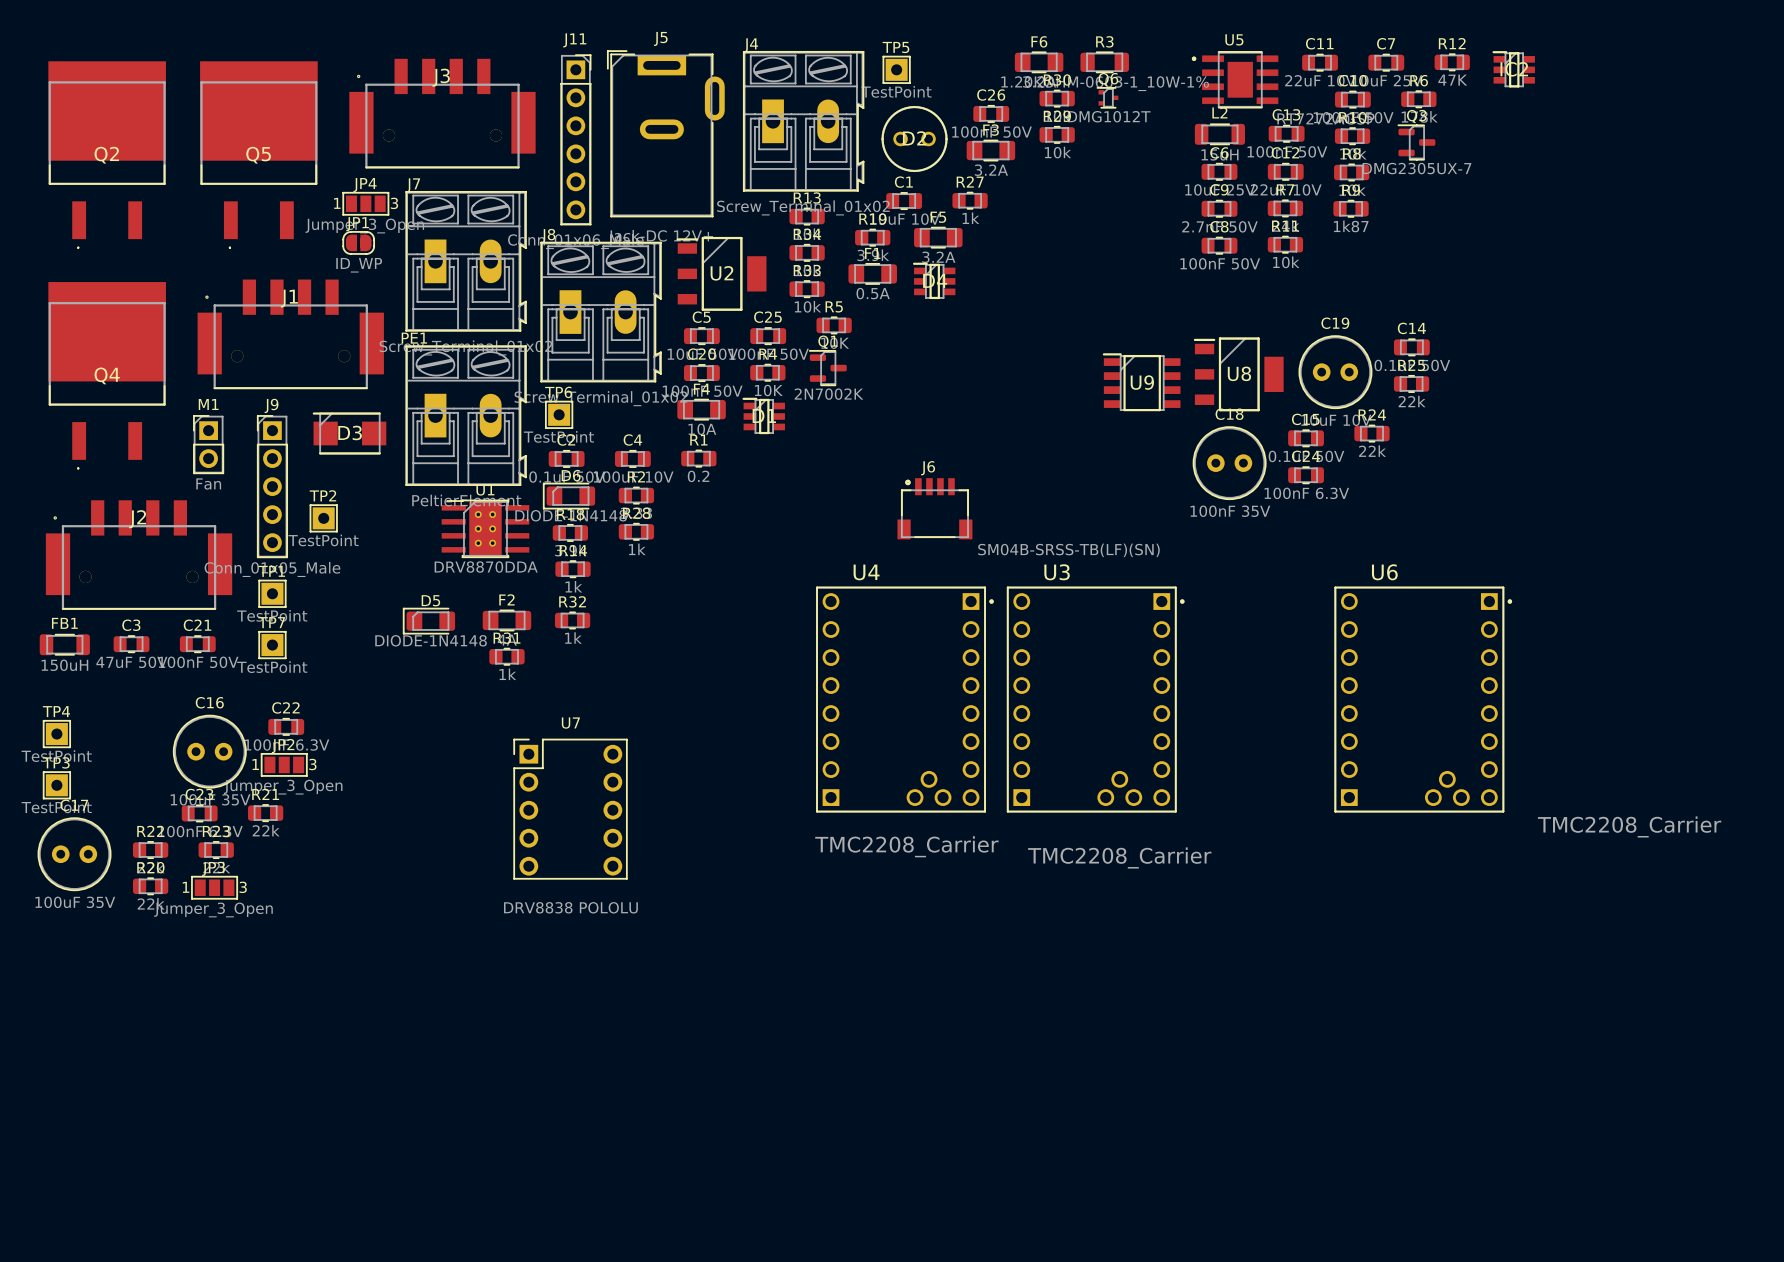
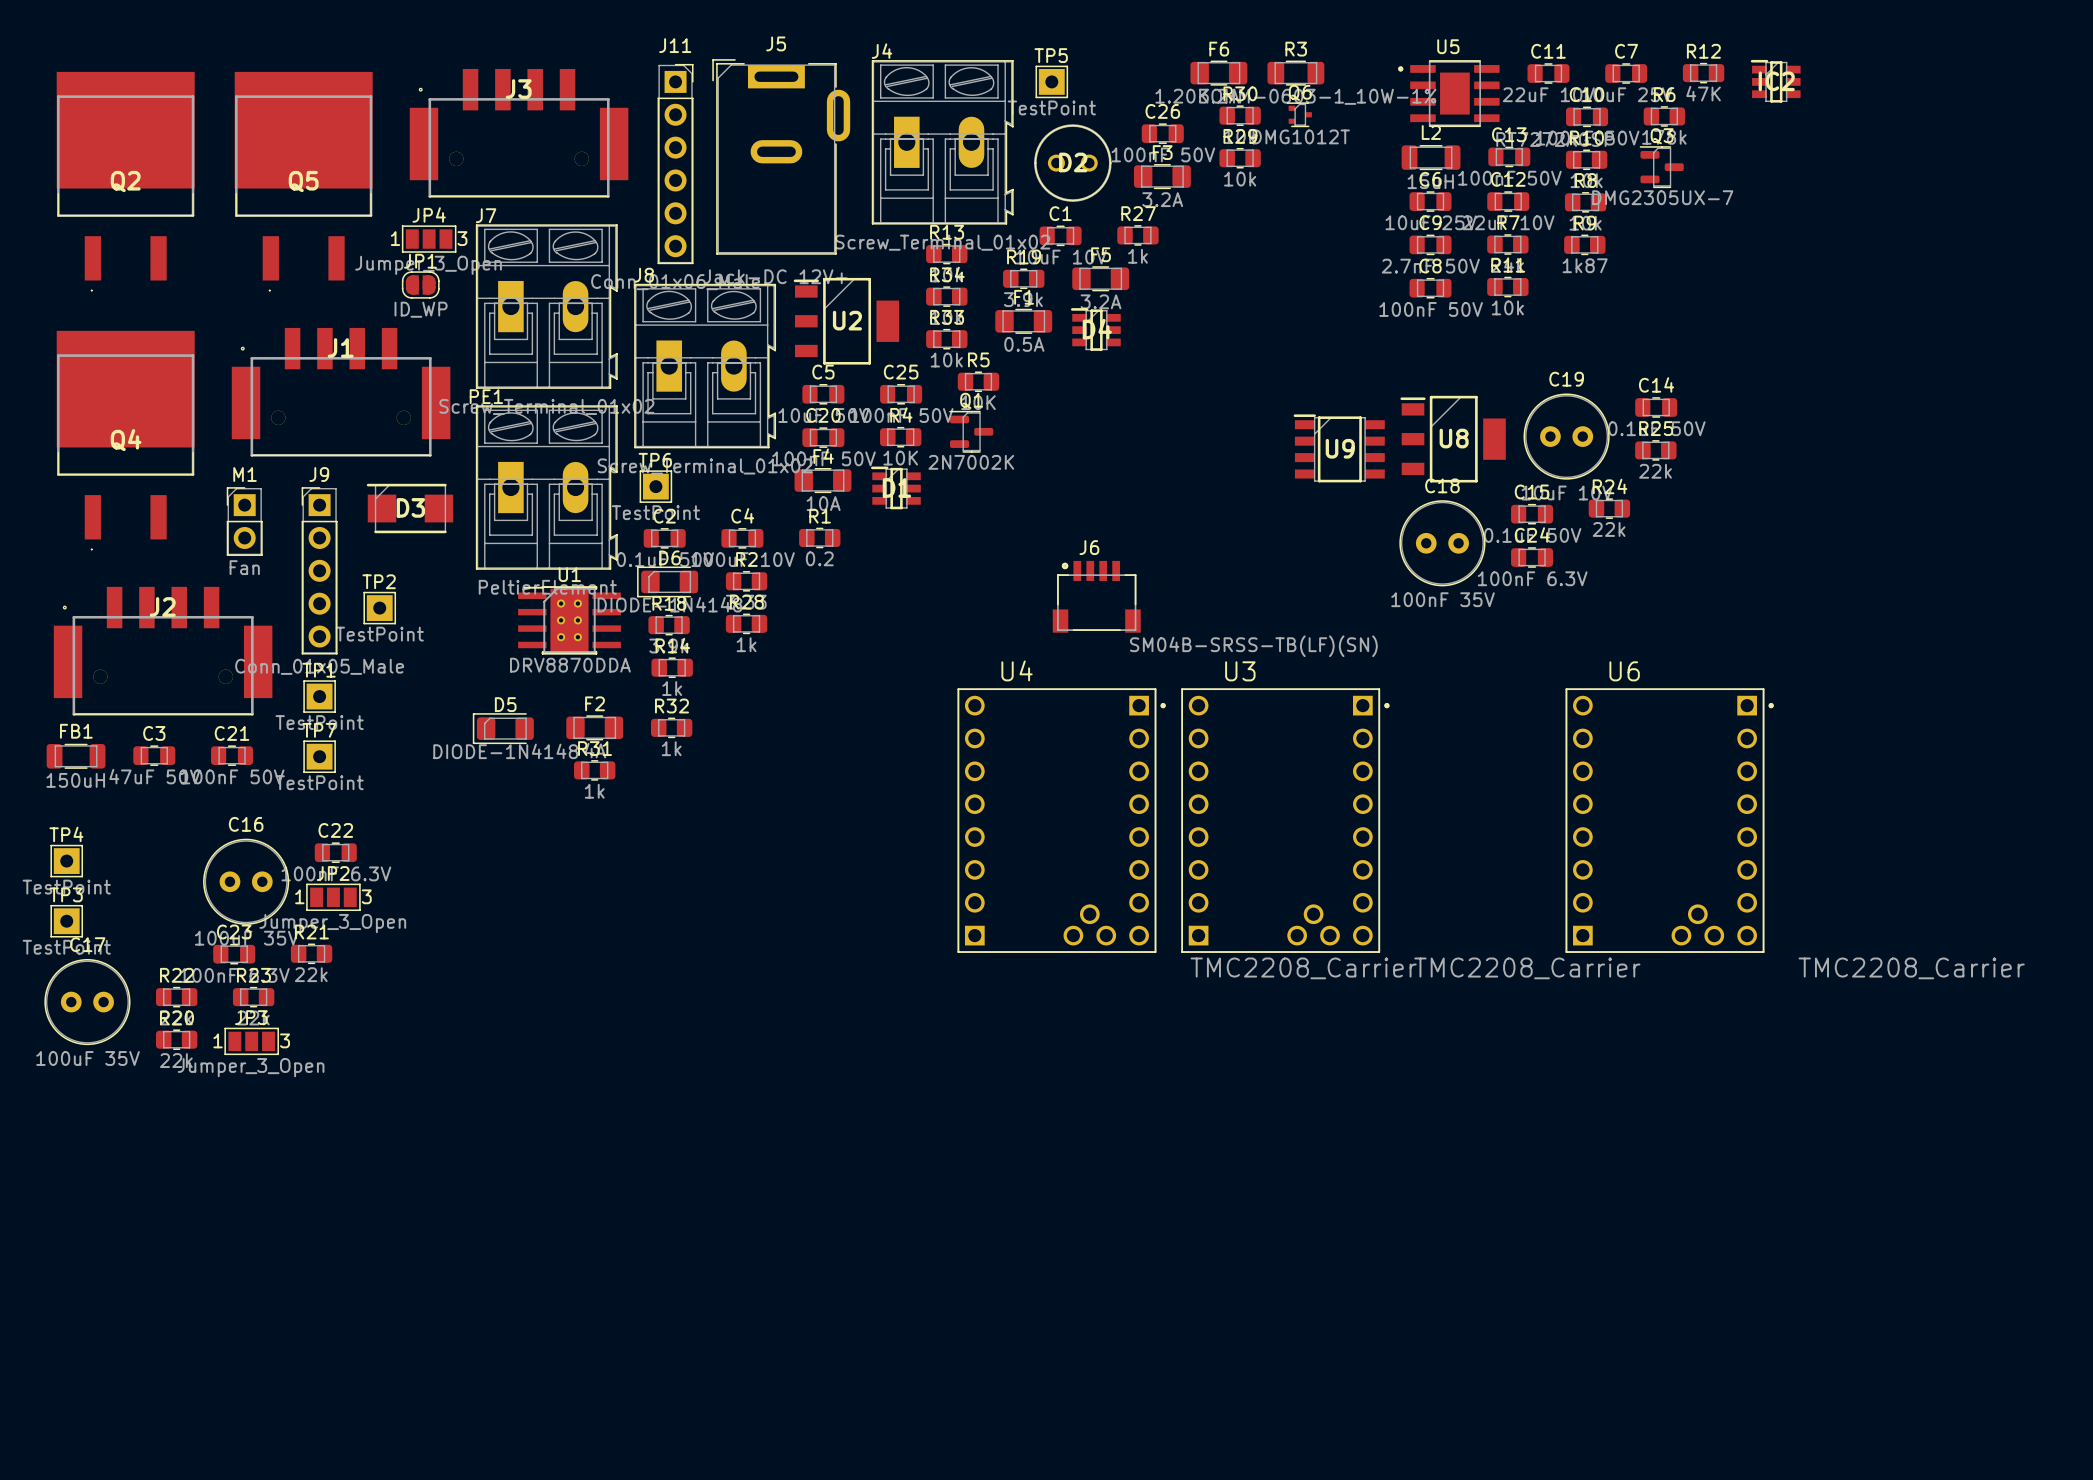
U7: DRV8838 POLOLU (570, 809) -> none
U4 value position: TMC2208_Carrier (906, 846) -> TMC2208_Carrier (1303, 968)
U3 value position: TMC2208_Carrier (1119, 857) -> TMC2208_Carrier (1527, 968)

